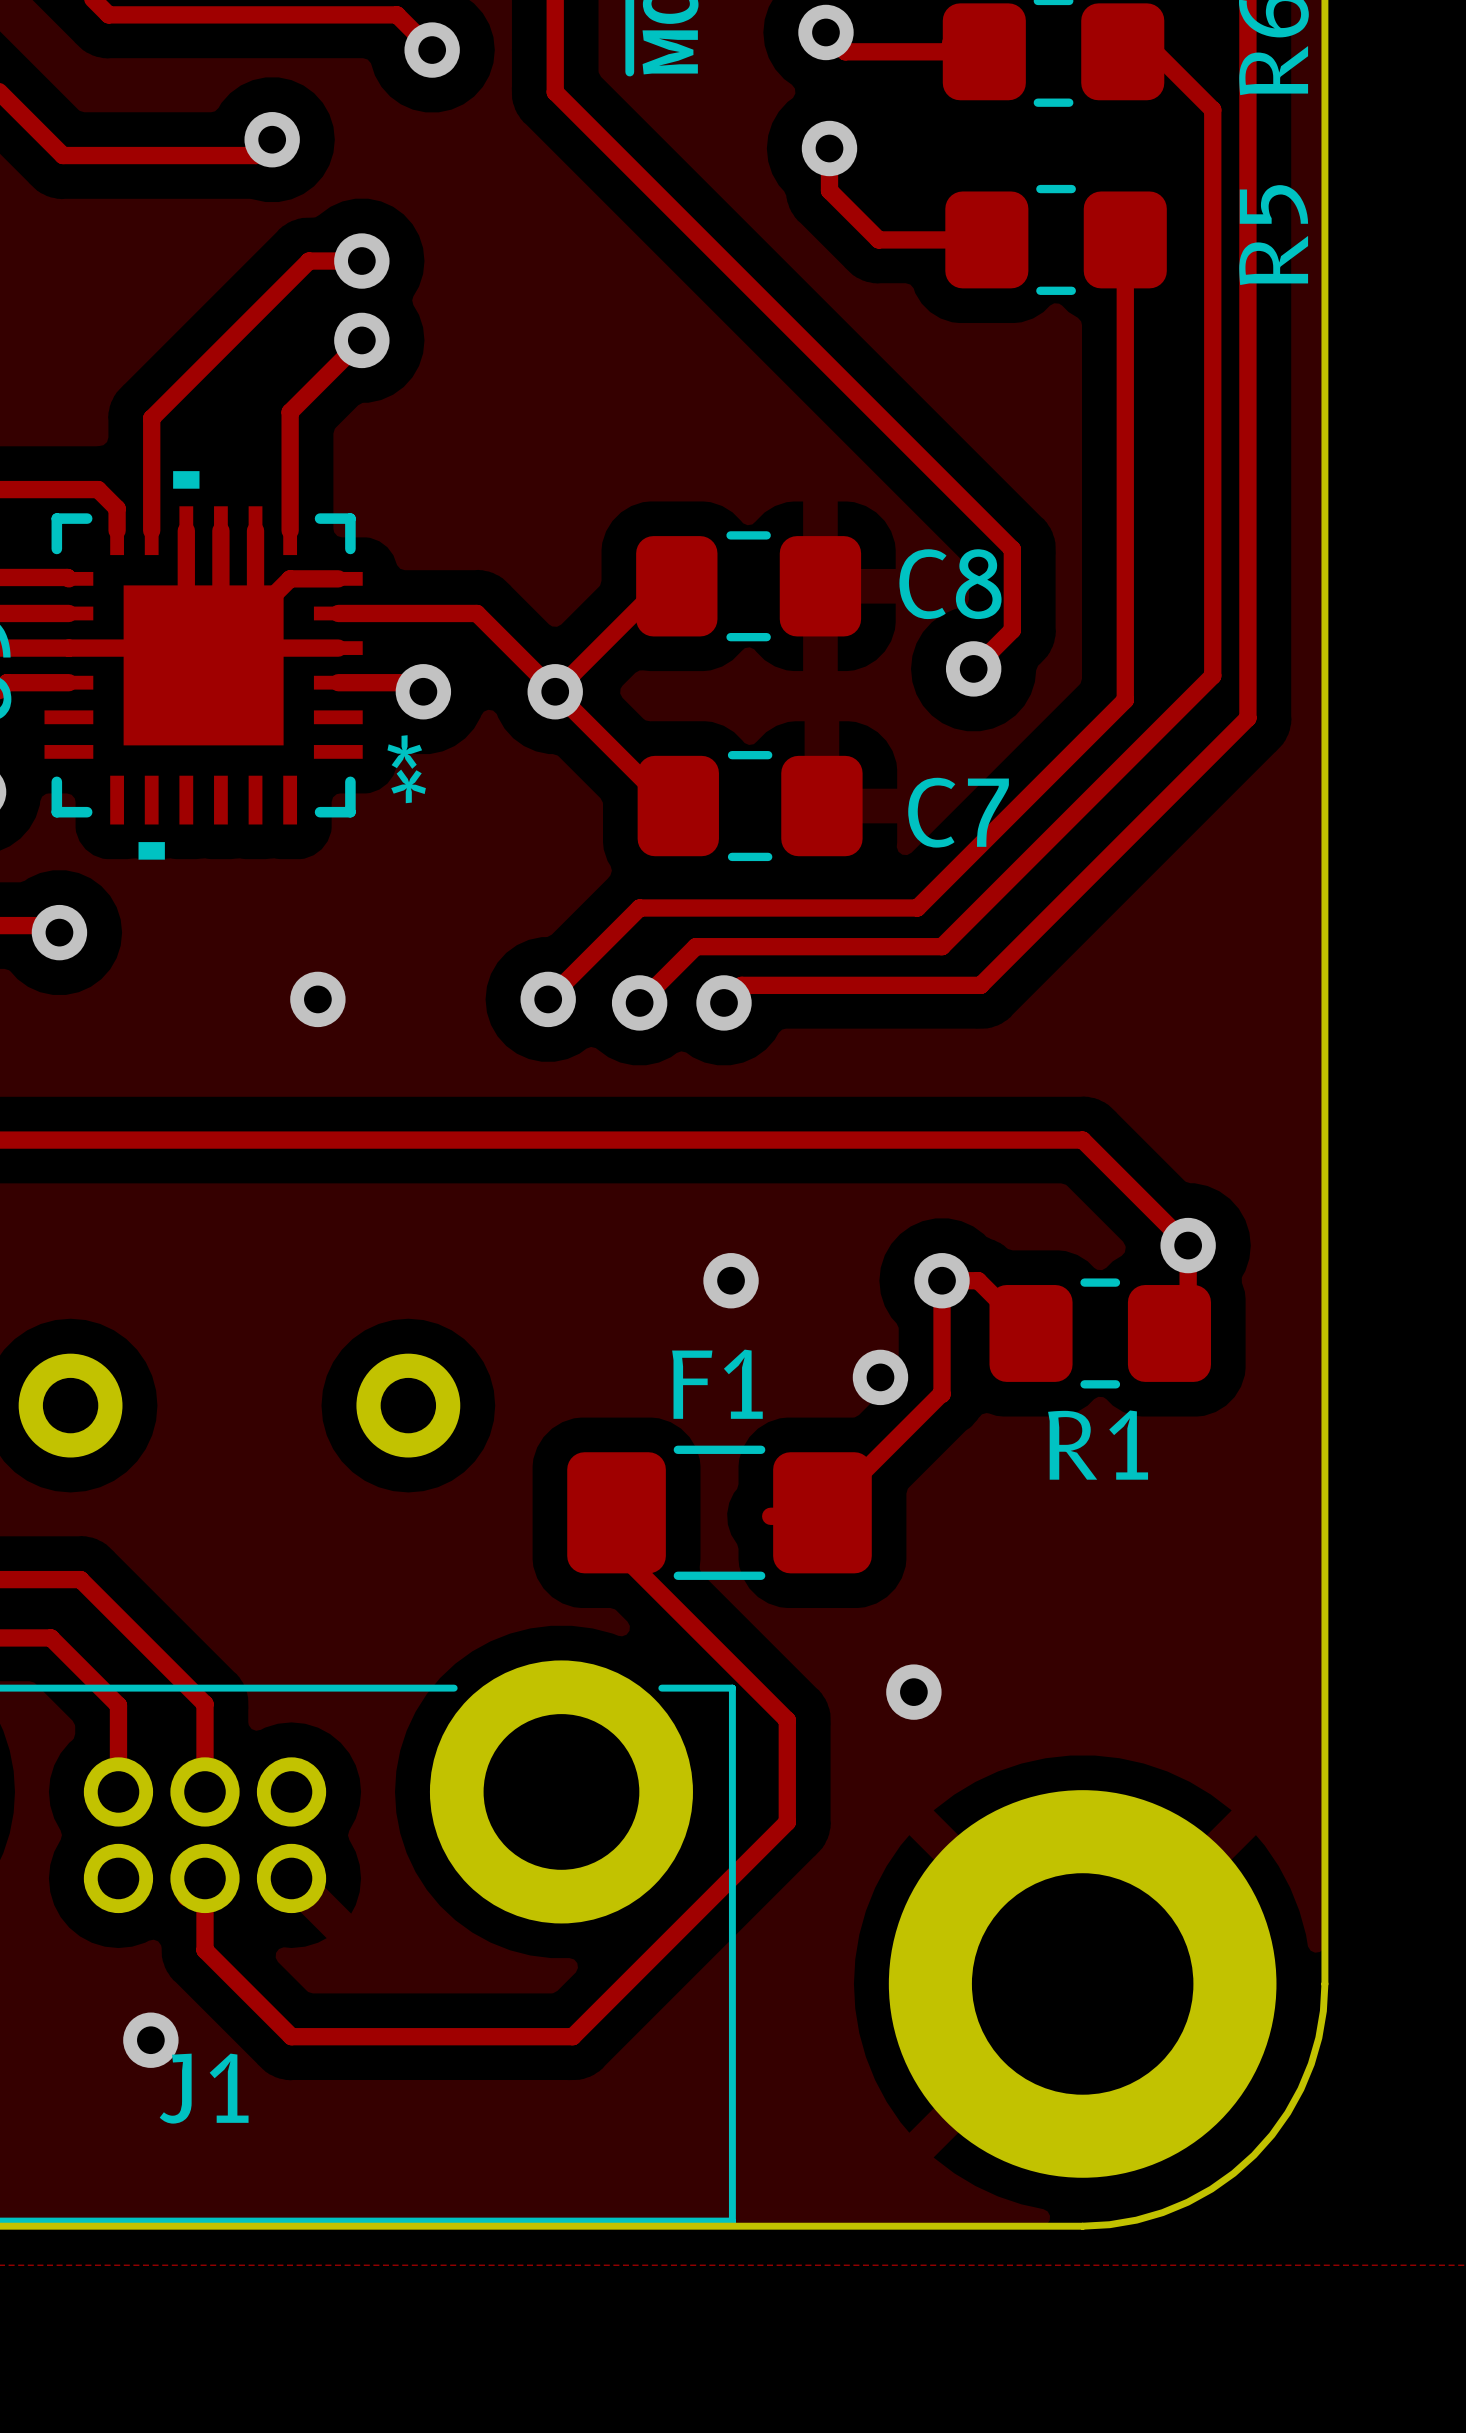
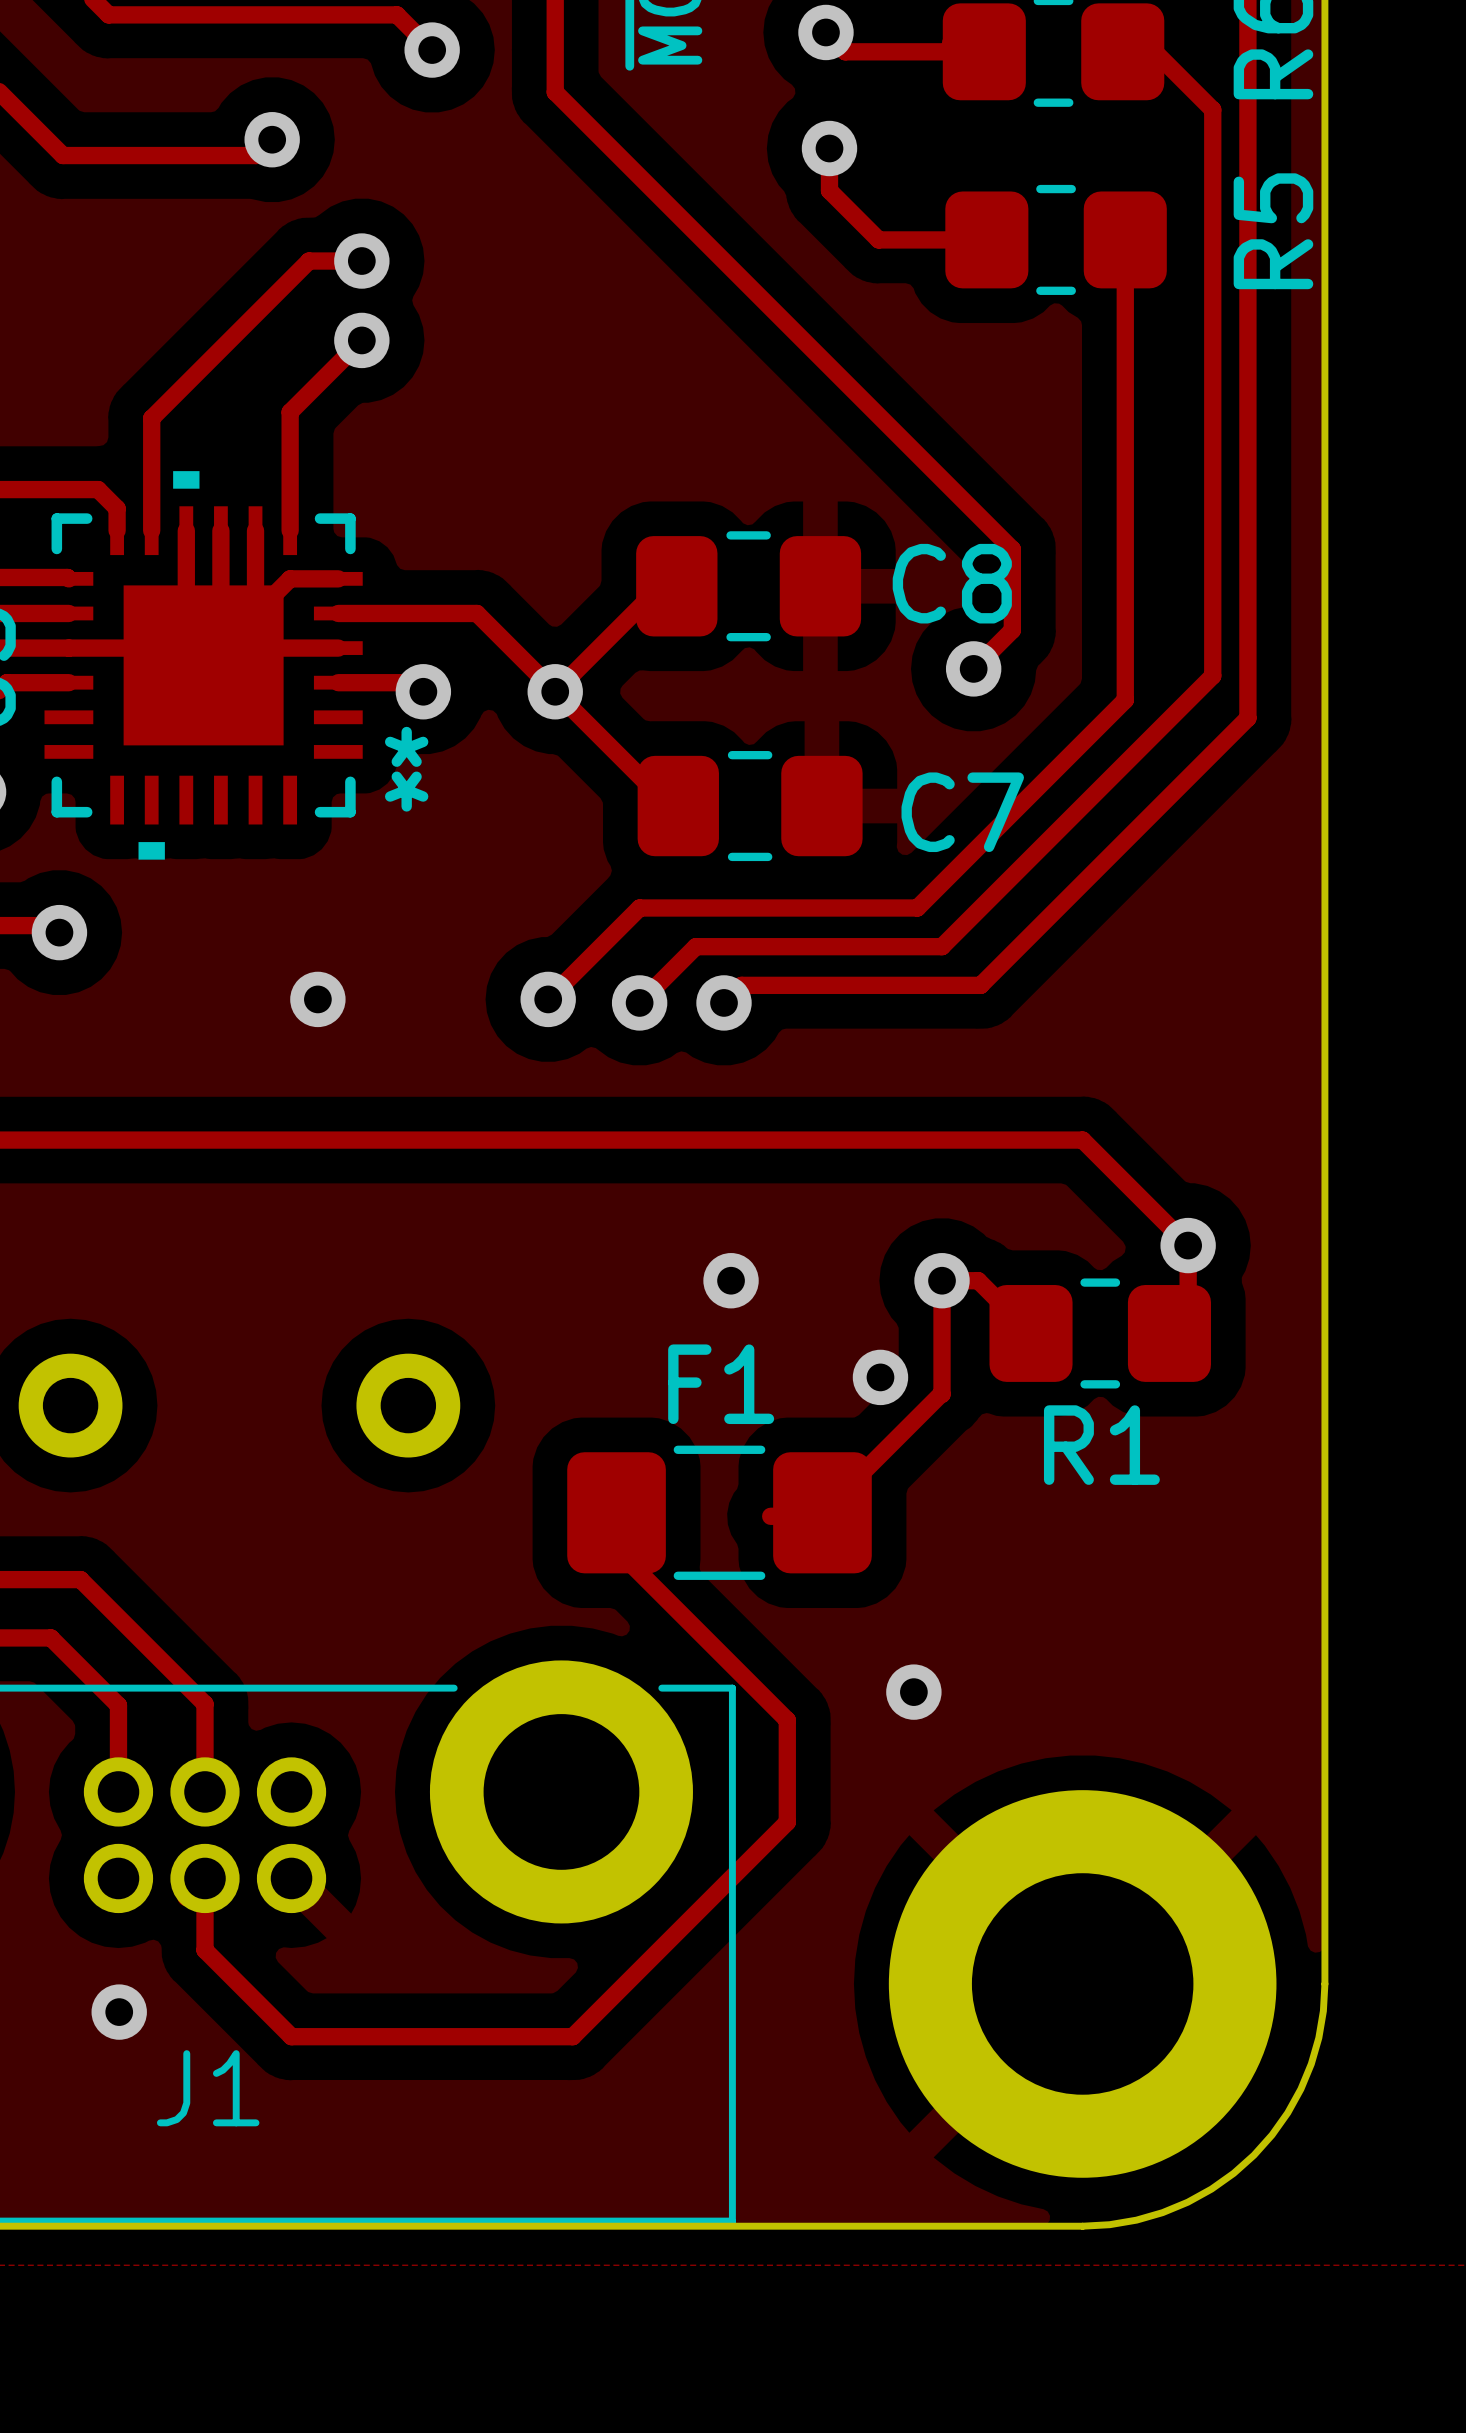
via position: (150, 2040) -> (119, 2012)

